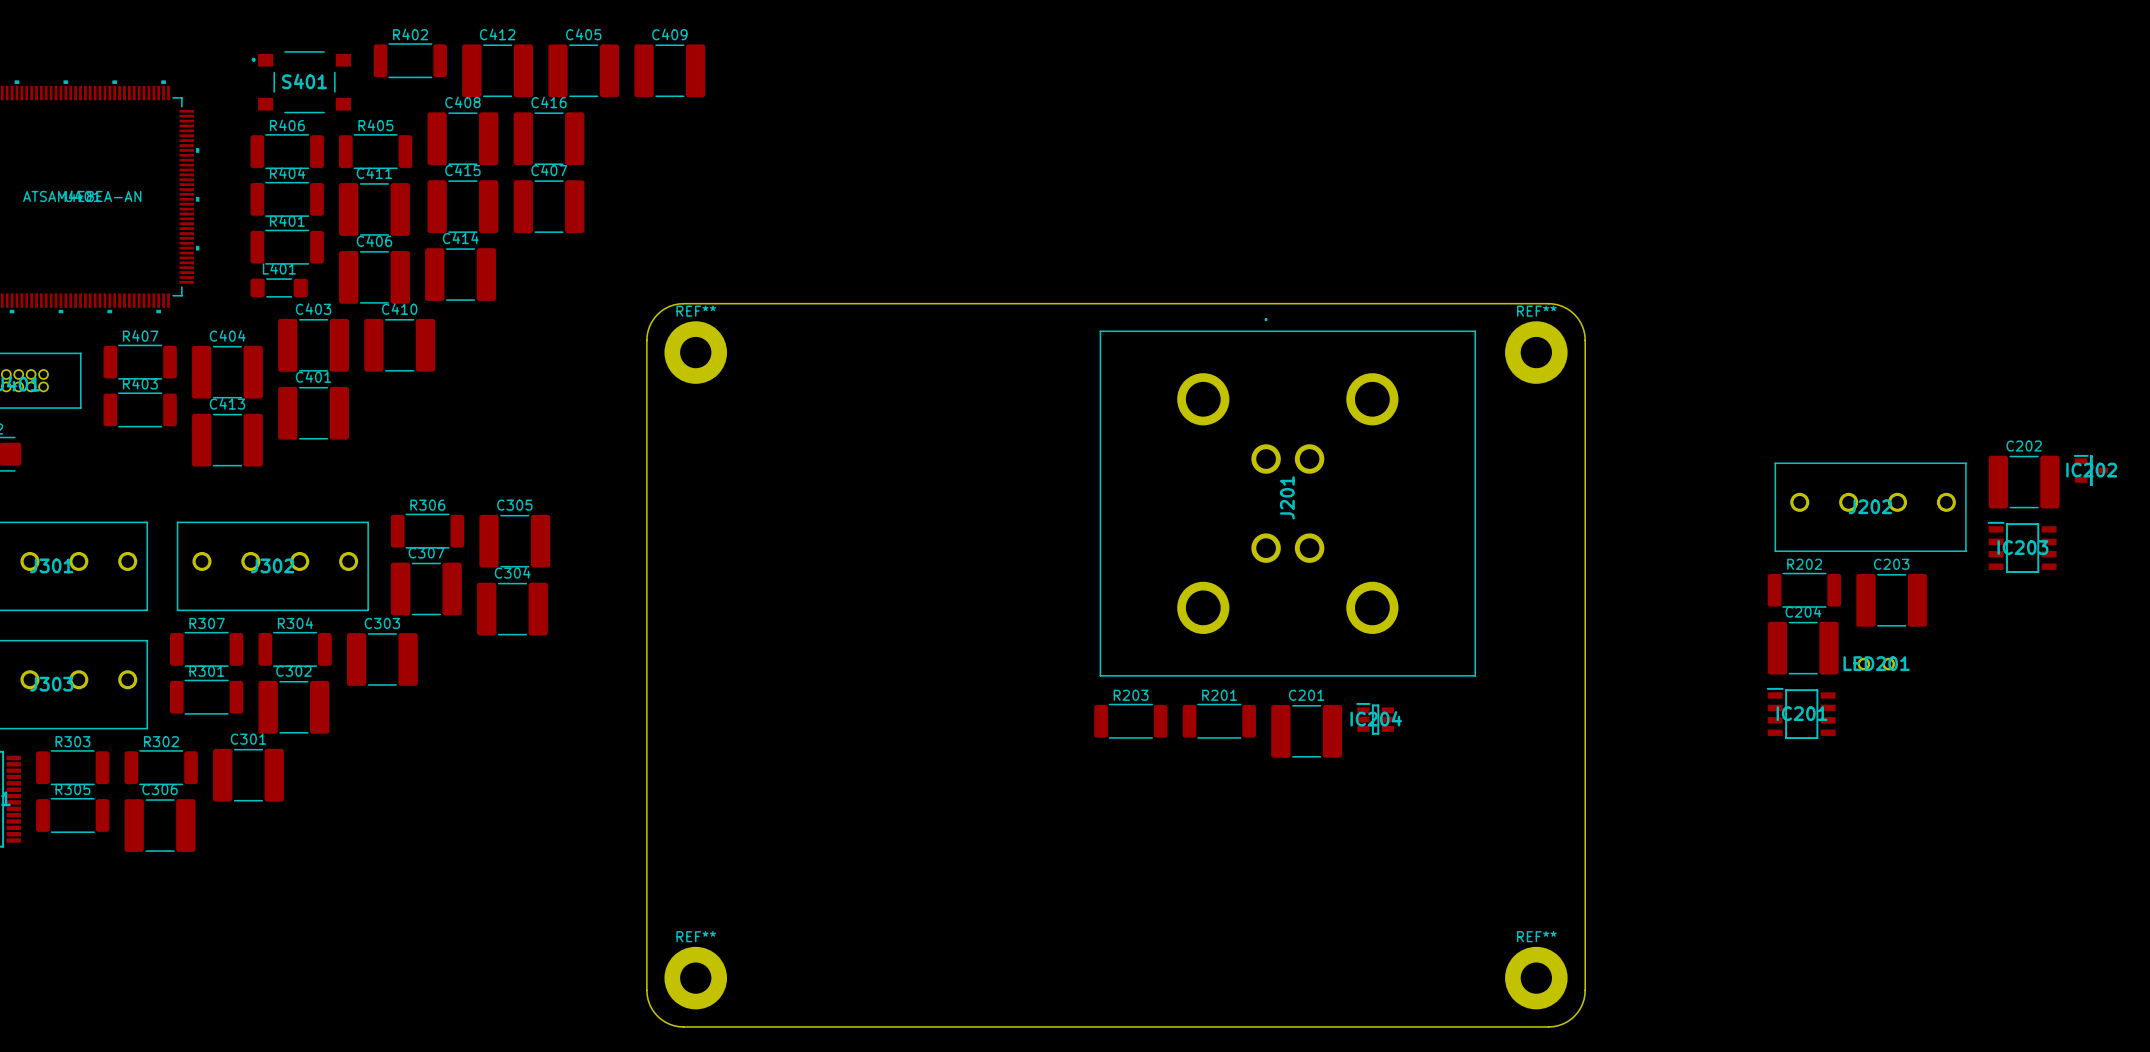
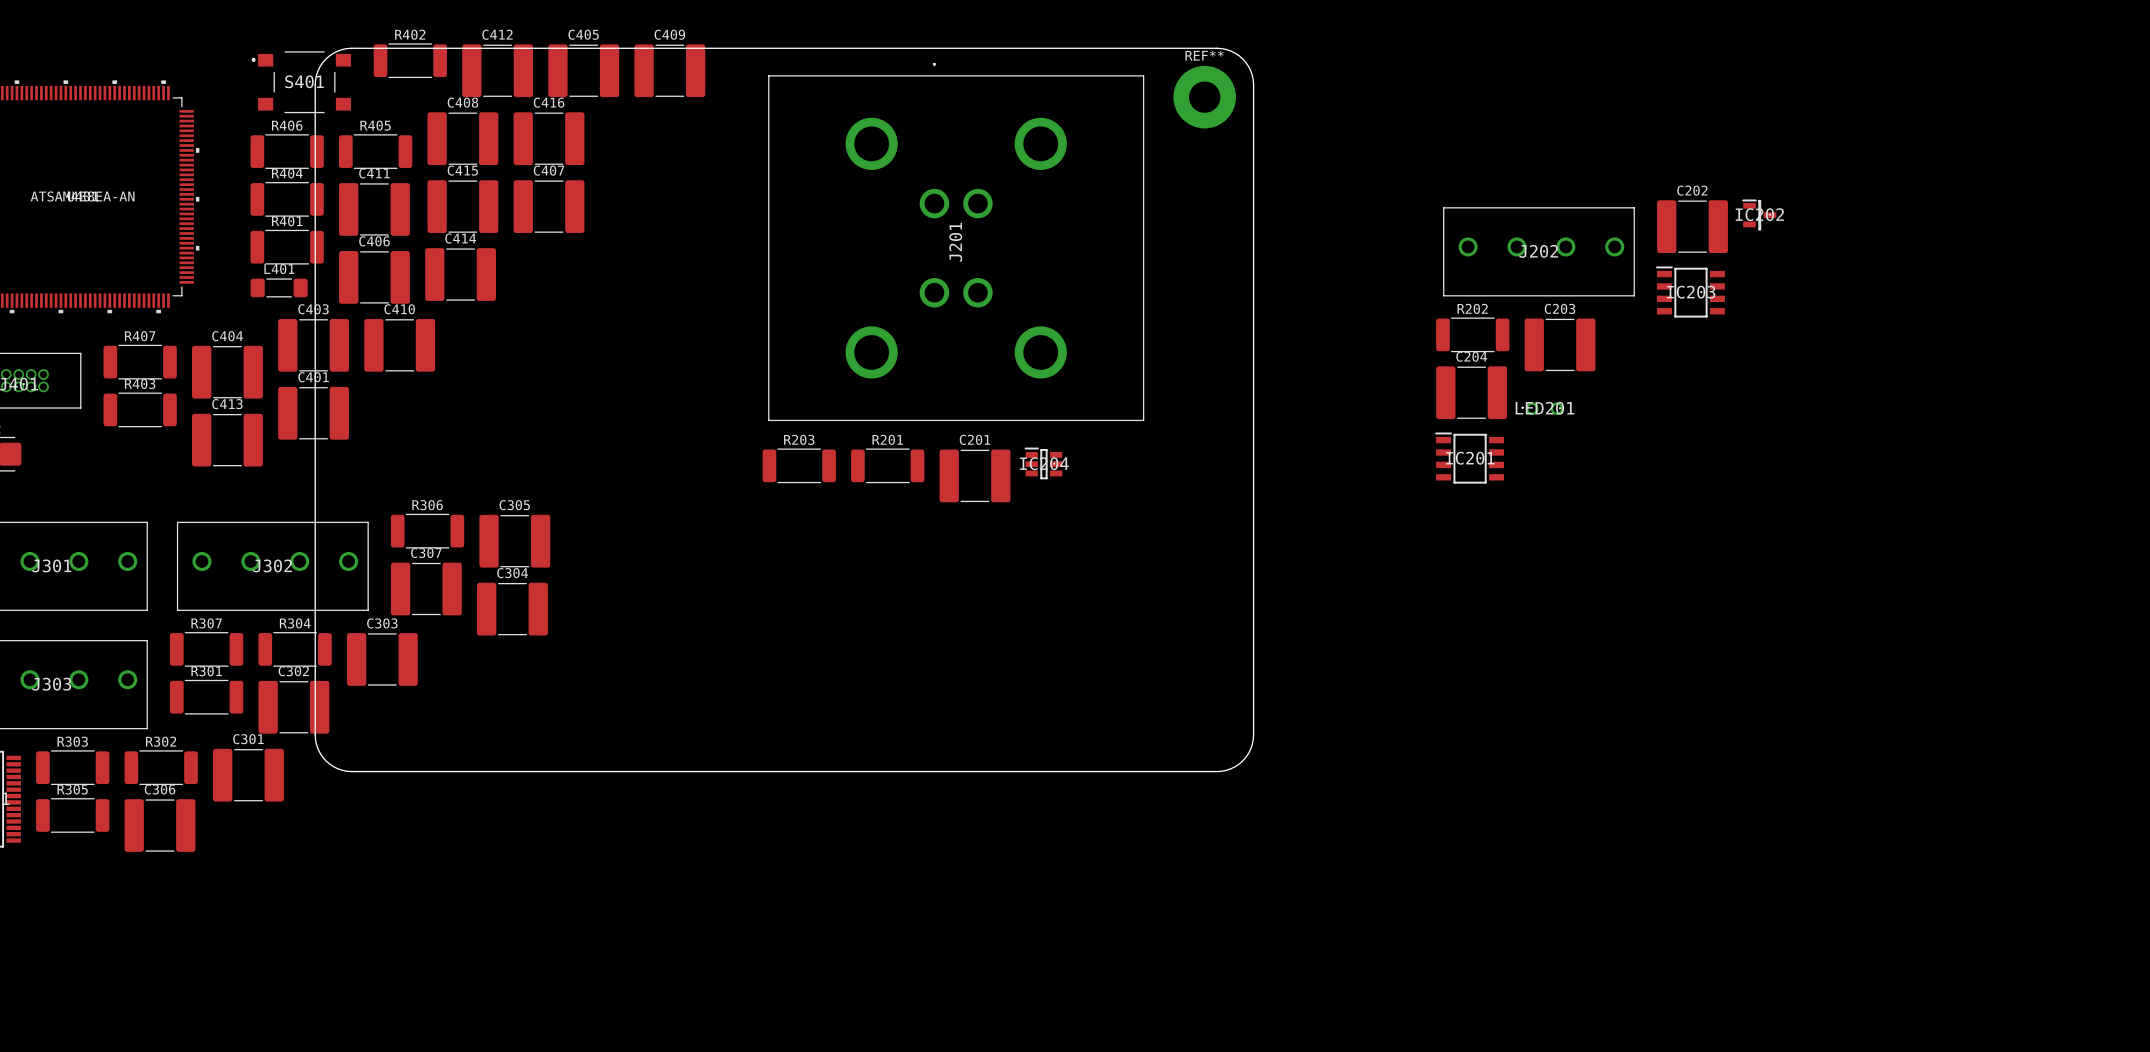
board edge: none -> (351, 48) (1216, 48) (1230, 51) (1239, 55) (1248, 66) (1253, 84) (1253, 734) (1252, 744) (1245, 757) (1230, 768) (1216, 771) (351, 771) (337, 768) (329, 764) (320, 753) (315, 734) (315, 84) (318, 70) (325, 59) (337, 51) (351, 48)
REF**: none -> (1204, 97)
board edge: (683, 303) (1548, 303) (1558, 304) (1570, 311) (1580, 322) (1585, 340) (1585, 990) (1583, 999) (1577, 1012) (1566, 1022) (1548, 1026) (683, 1026) (674, 1025) (661, 1019) (651, 1008) (646, 990) (646, 340) (649, 326) (657, 314) (669, 306) (683, 303) -> none
REF**: (695, 352) -> none
REF**: (1536, 352) -> none
IC202 position: (2090, 470) -> (1759, 214)
C202 position: (2024, 482) -> (1692, 226)
J201 position: (1287, 497) -> (956, 241)
J202 position: (1870, 507) -> (1538, 251)
IC203 position: (2022, 547) -> (1690, 292)
R202 position: (1804, 590) -> (1472, 334)
C203 position: (1891, 600) -> (1560, 344)
C204 position: (1803, 648) -> (1471, 392)
LED201 position: (1874, 664) -> (1542, 408)
IC201 position: (1801, 713) -> (1469, 458)
IC204 position: (1375, 718) -> (1043, 463)
R203 position: (1130, 721) -> (799, 465)
R201 position: (1219, 721) -> (887, 465)
C201 position: (1306, 731) -> (975, 475)
REF**: (695, 978) -> none
REF**: (1536, 978) -> none

